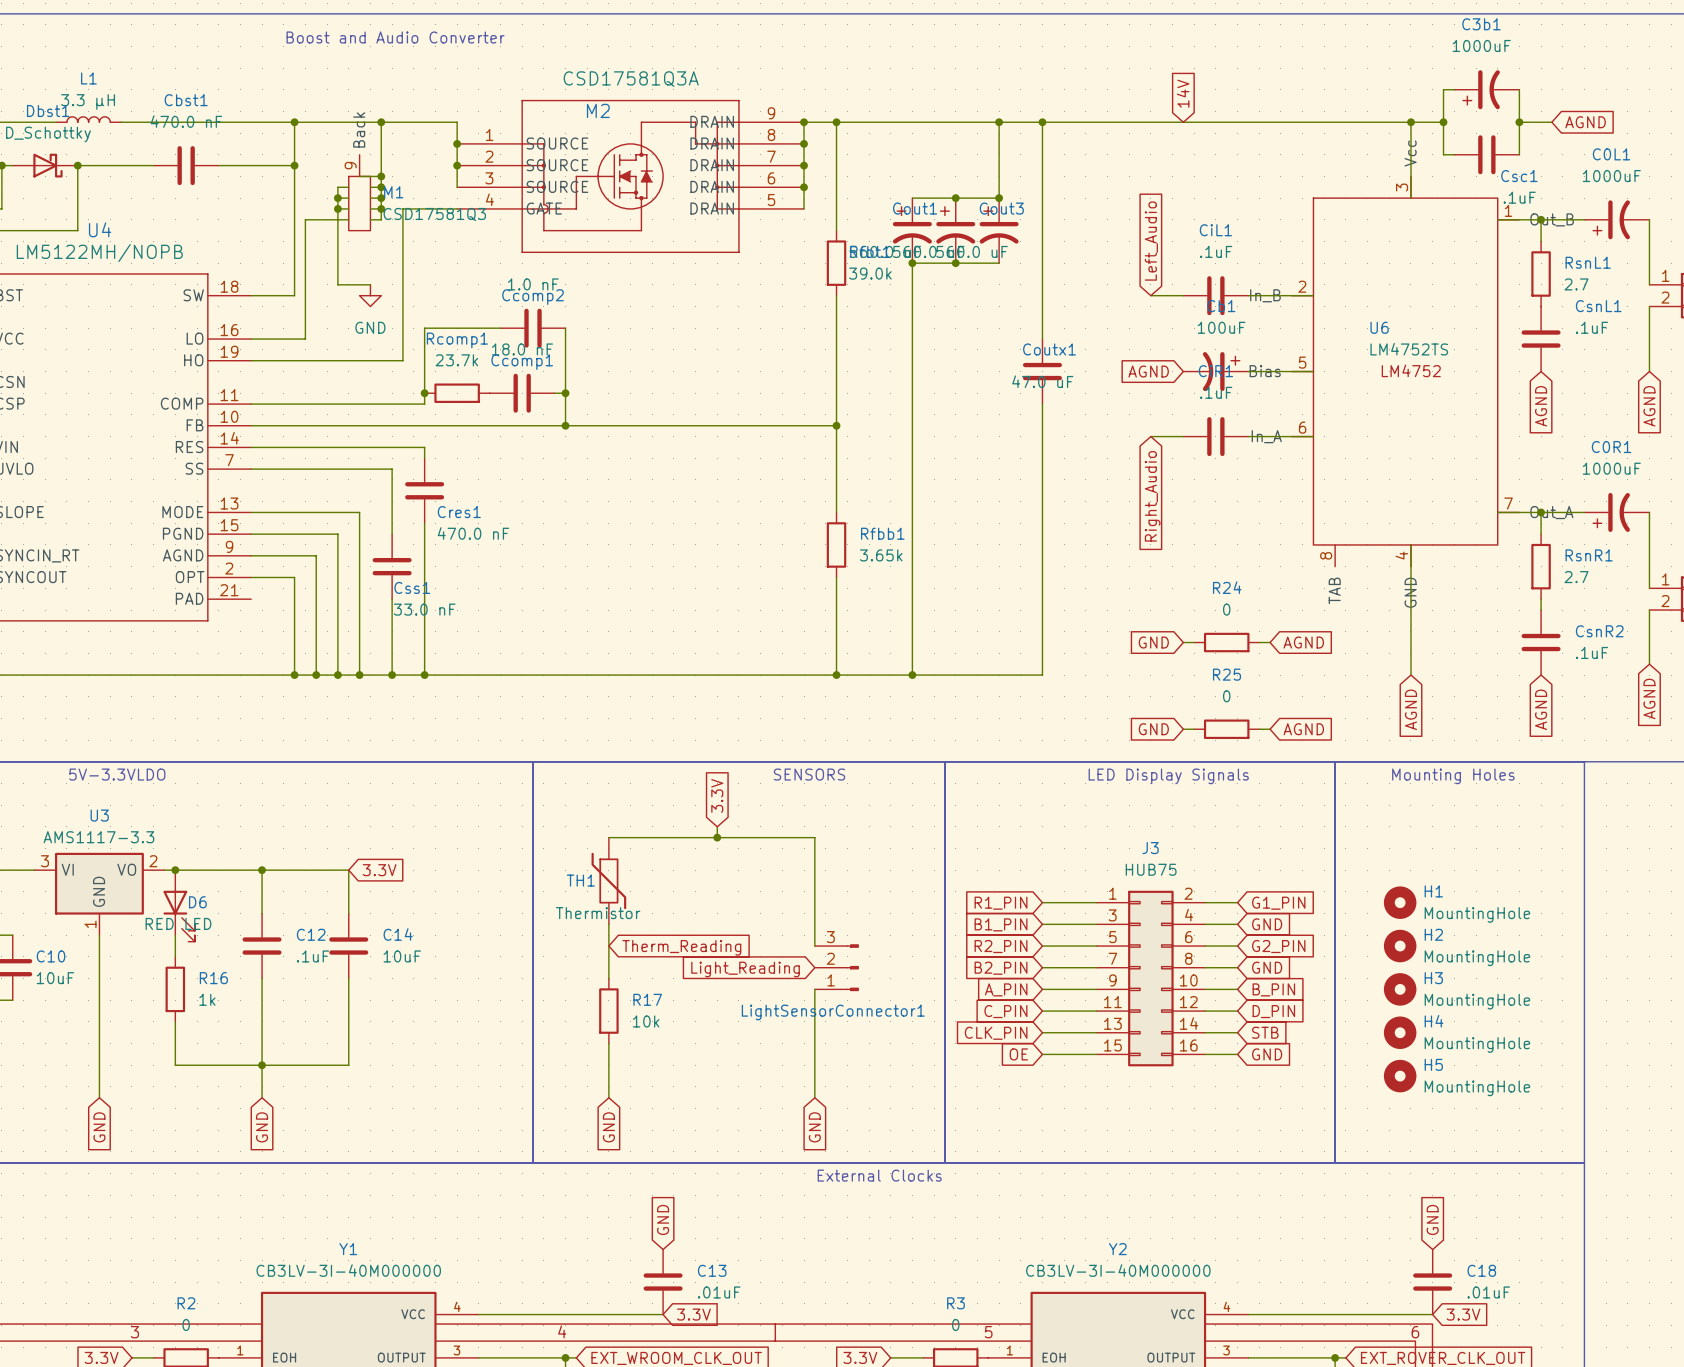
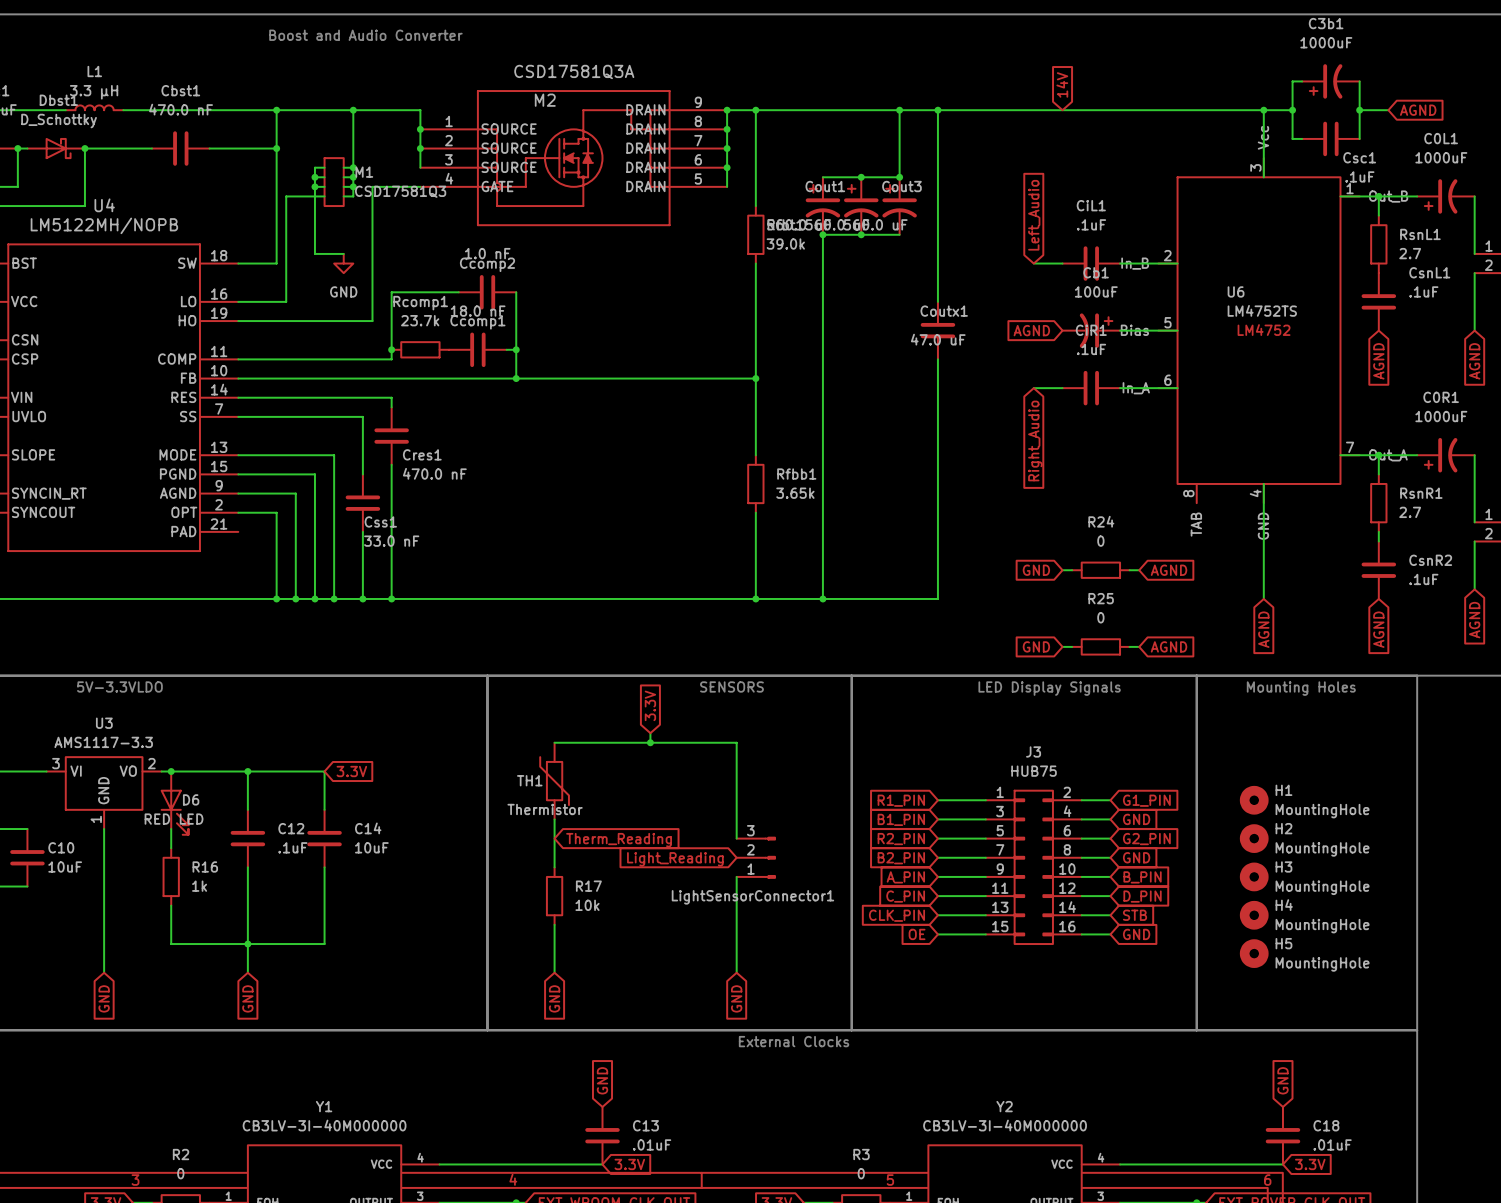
M1 symbol: [348, 154, 371, 231] -> [324, 158, 344, 207]
junction: (381, 176) -> none

